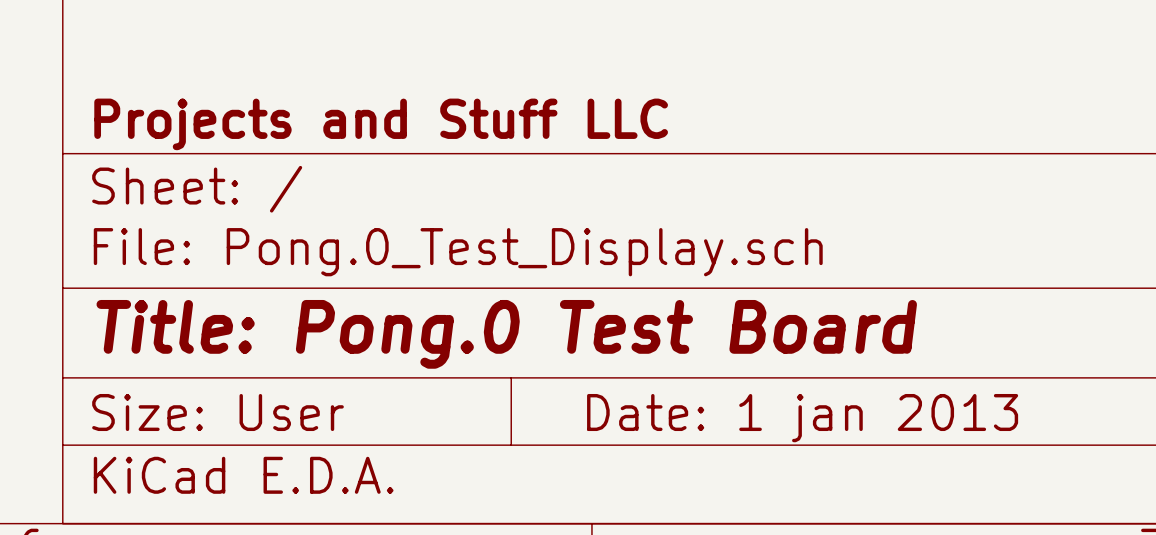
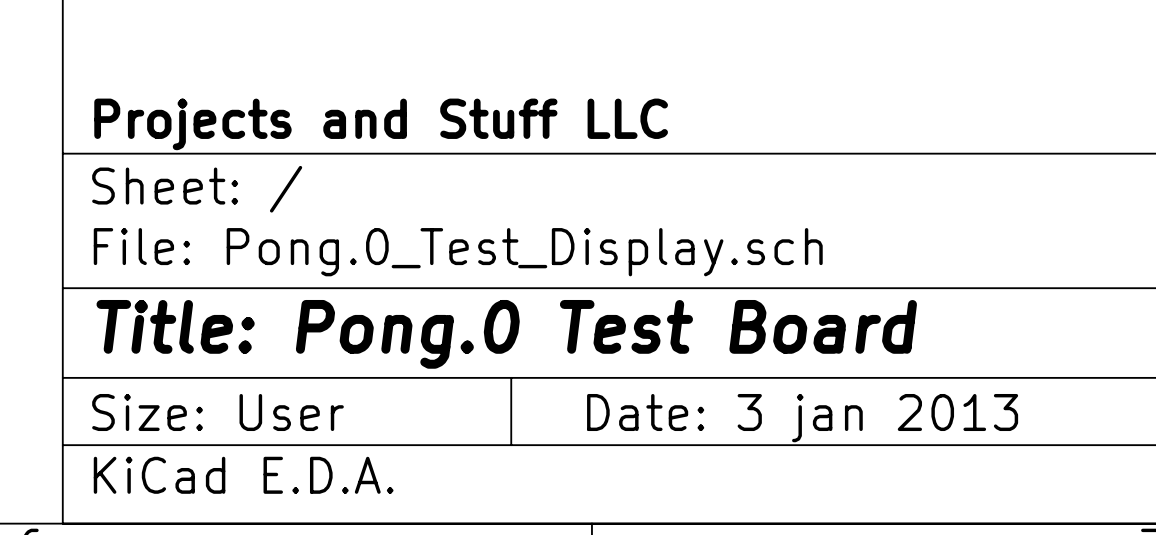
title block: Date: 1 jan 2013 (802, 418) -> Date: 3 jan 2013 (802, 418)

